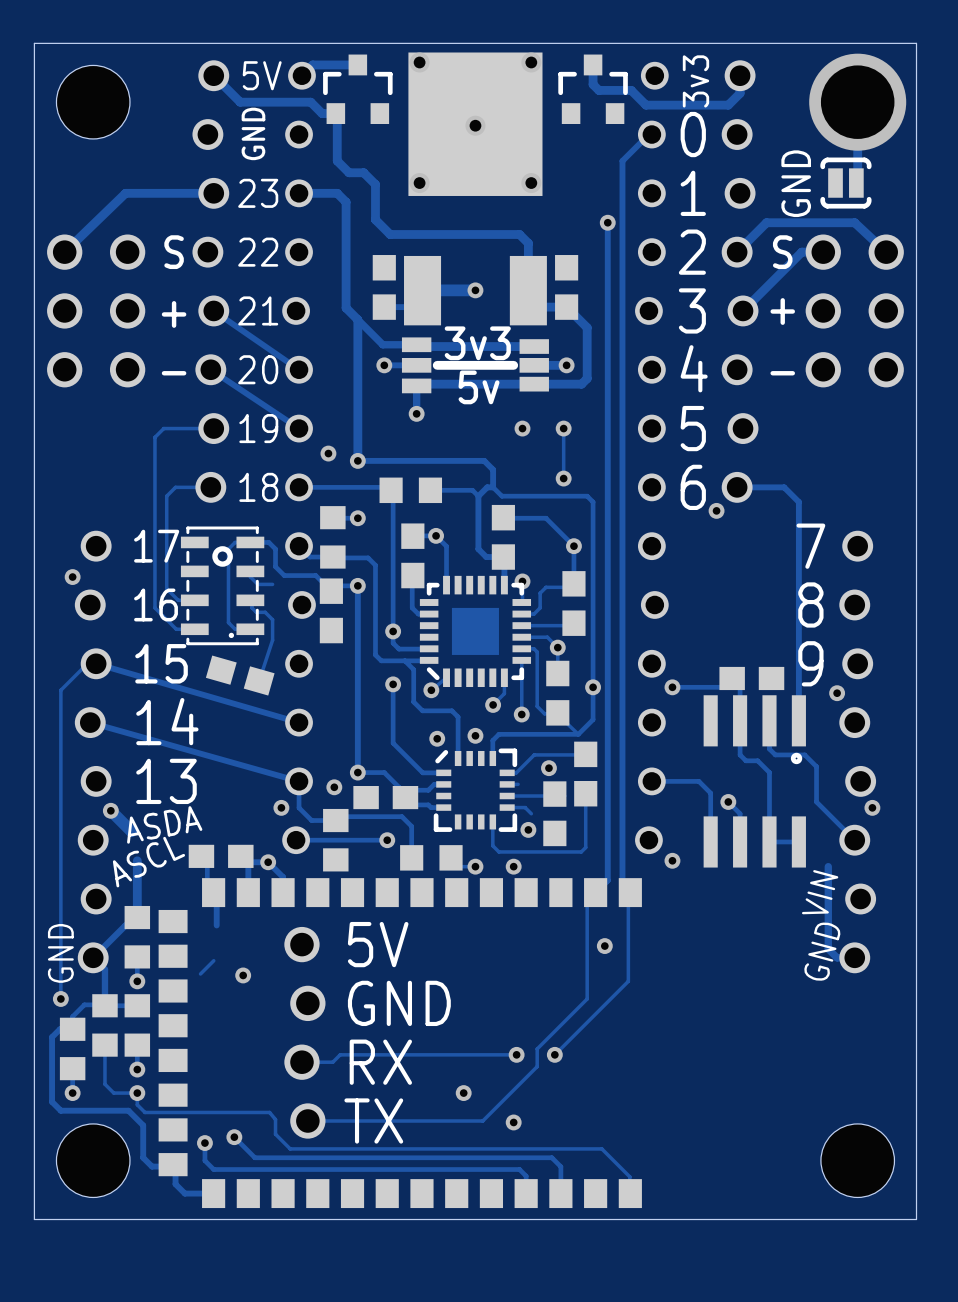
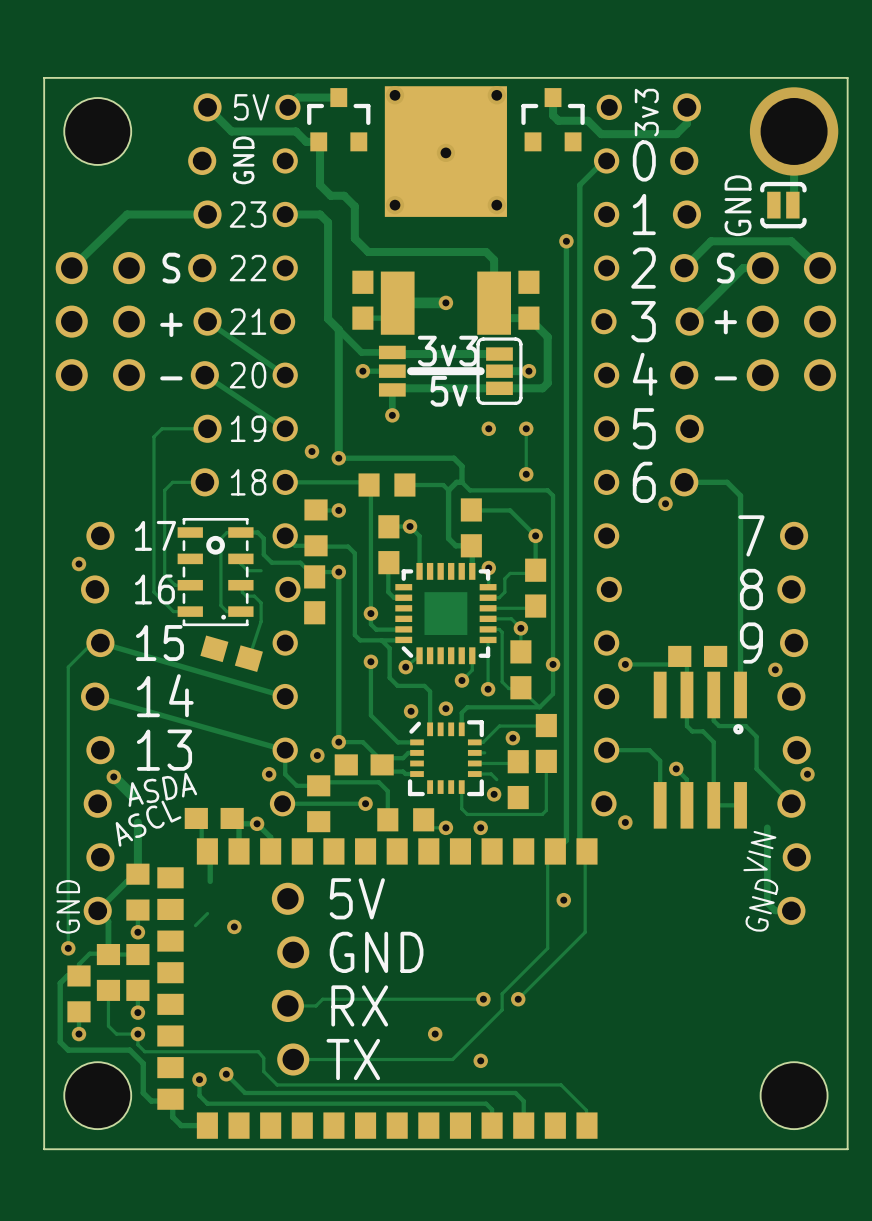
part footprint: [519, 339, 549, 392] -> [476, 337, 523, 405]

